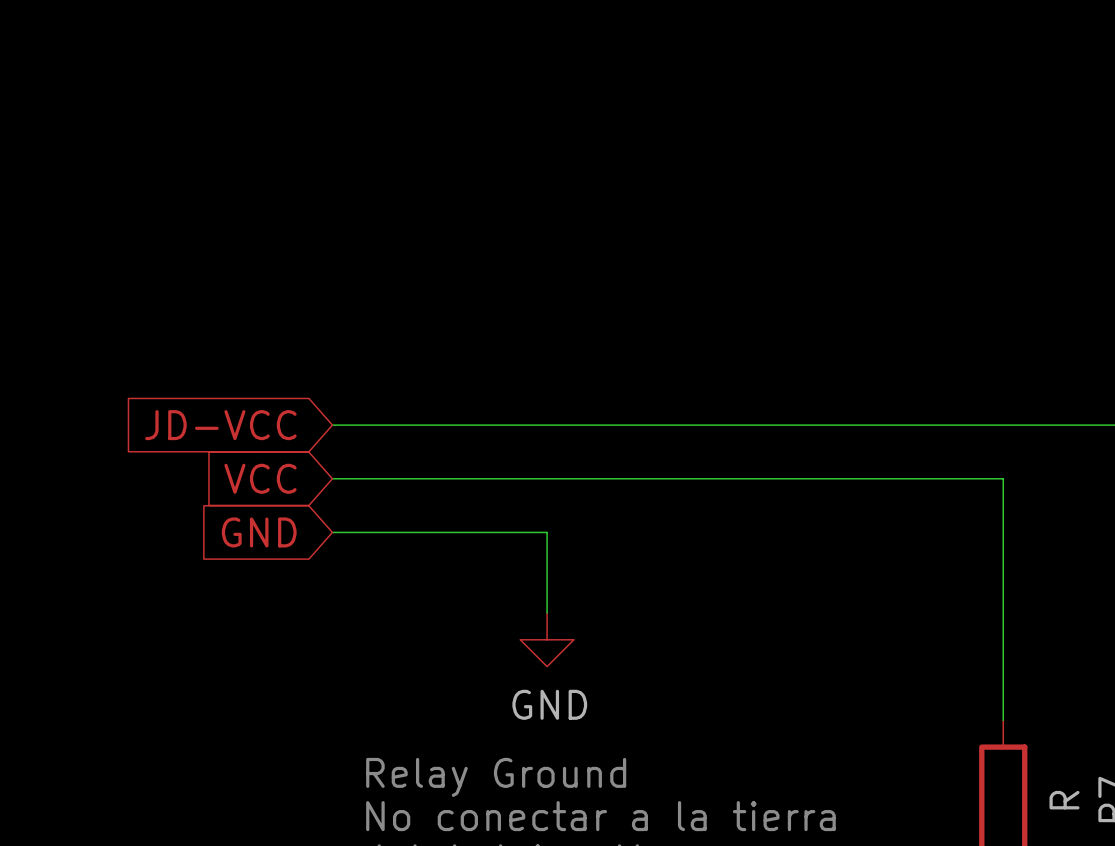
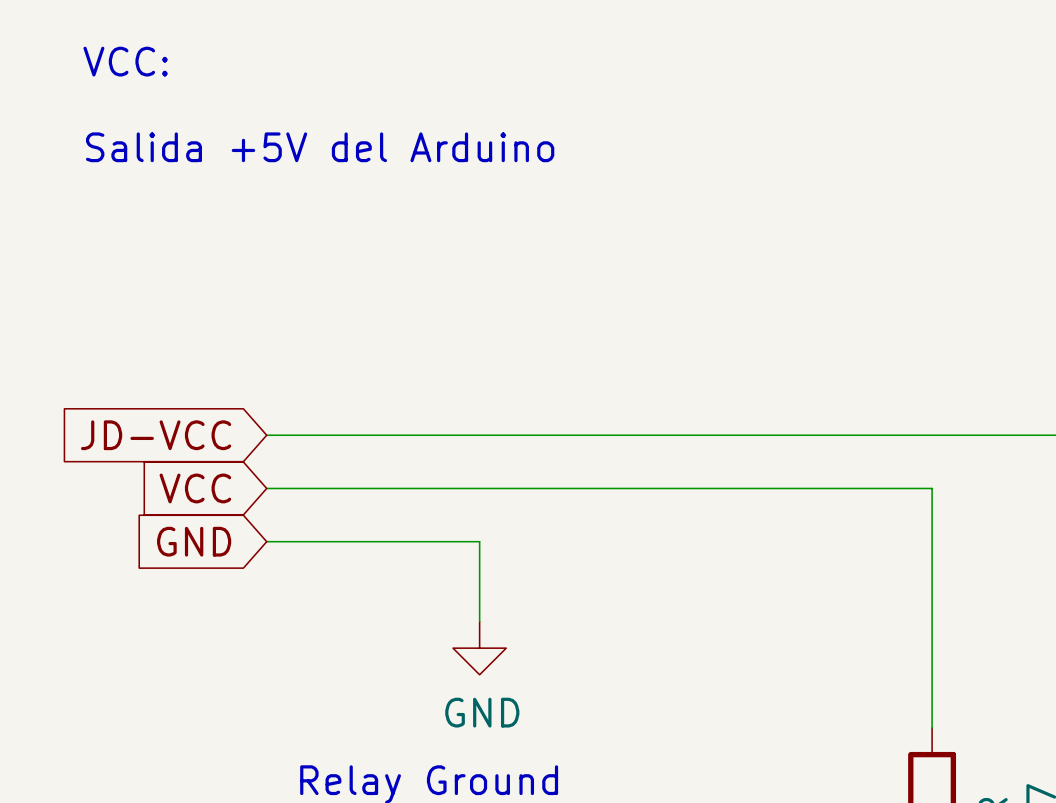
text: none -> VCC: (125, 61)
text: none -> Salida +5V del Arduino (320, 147)

